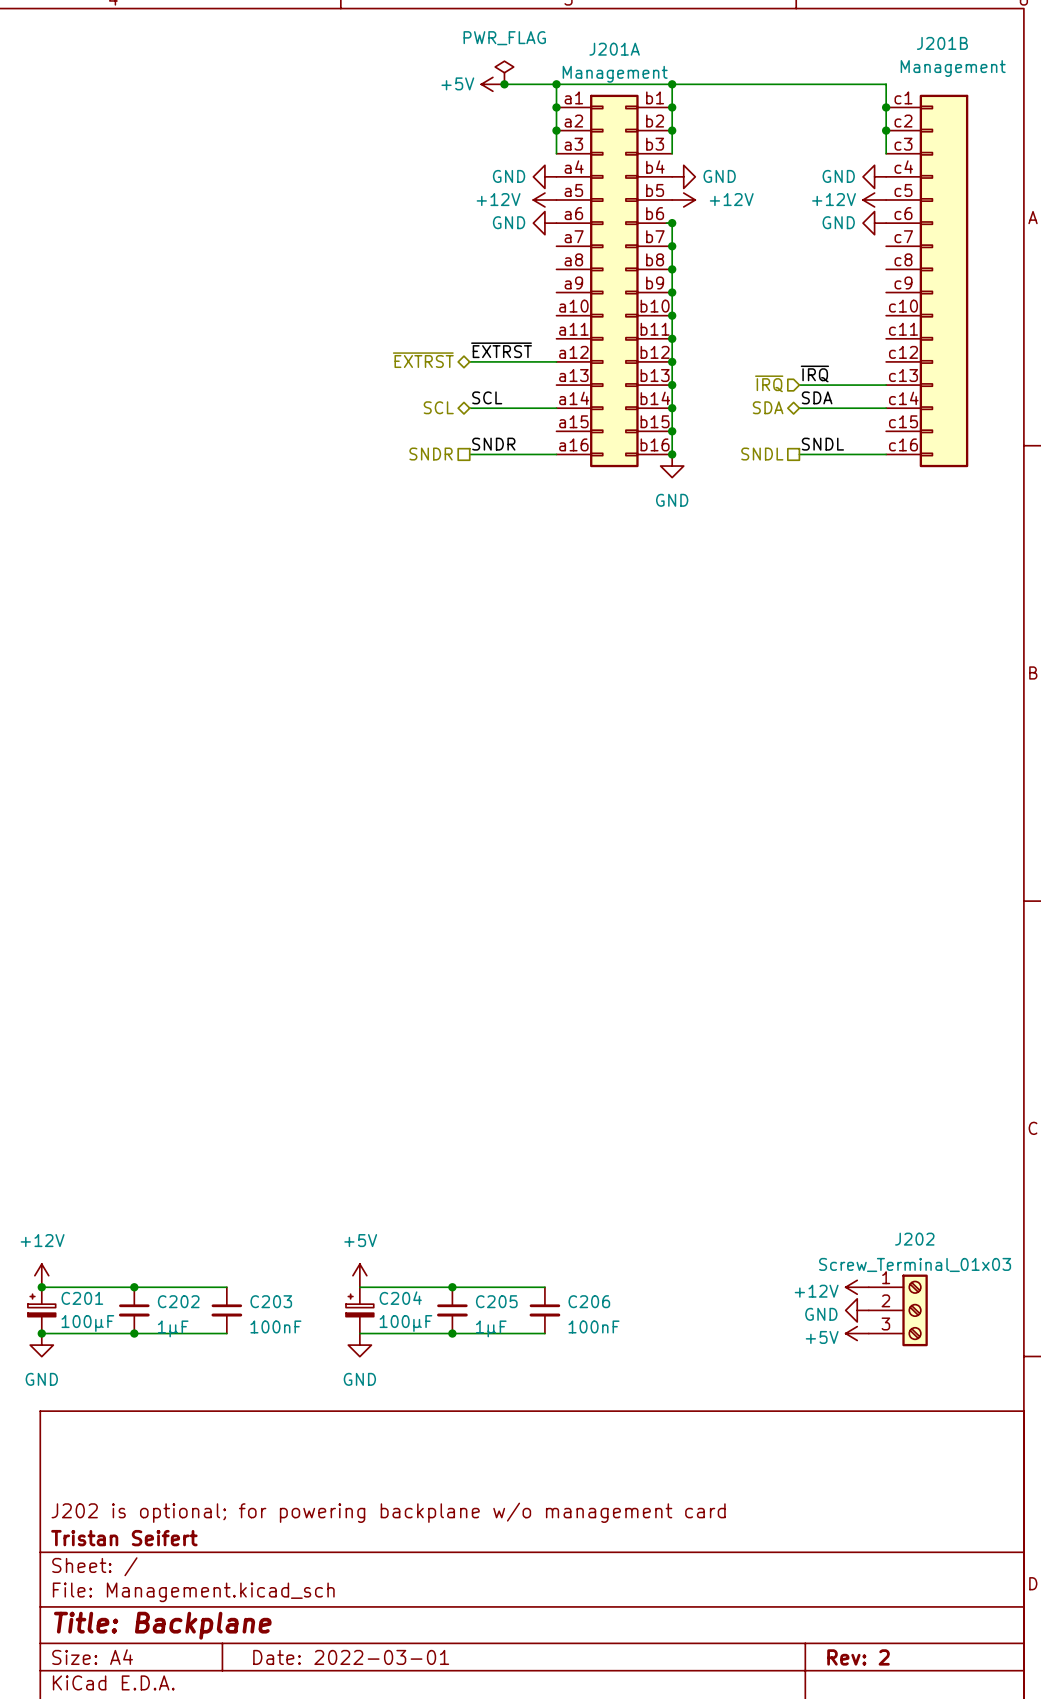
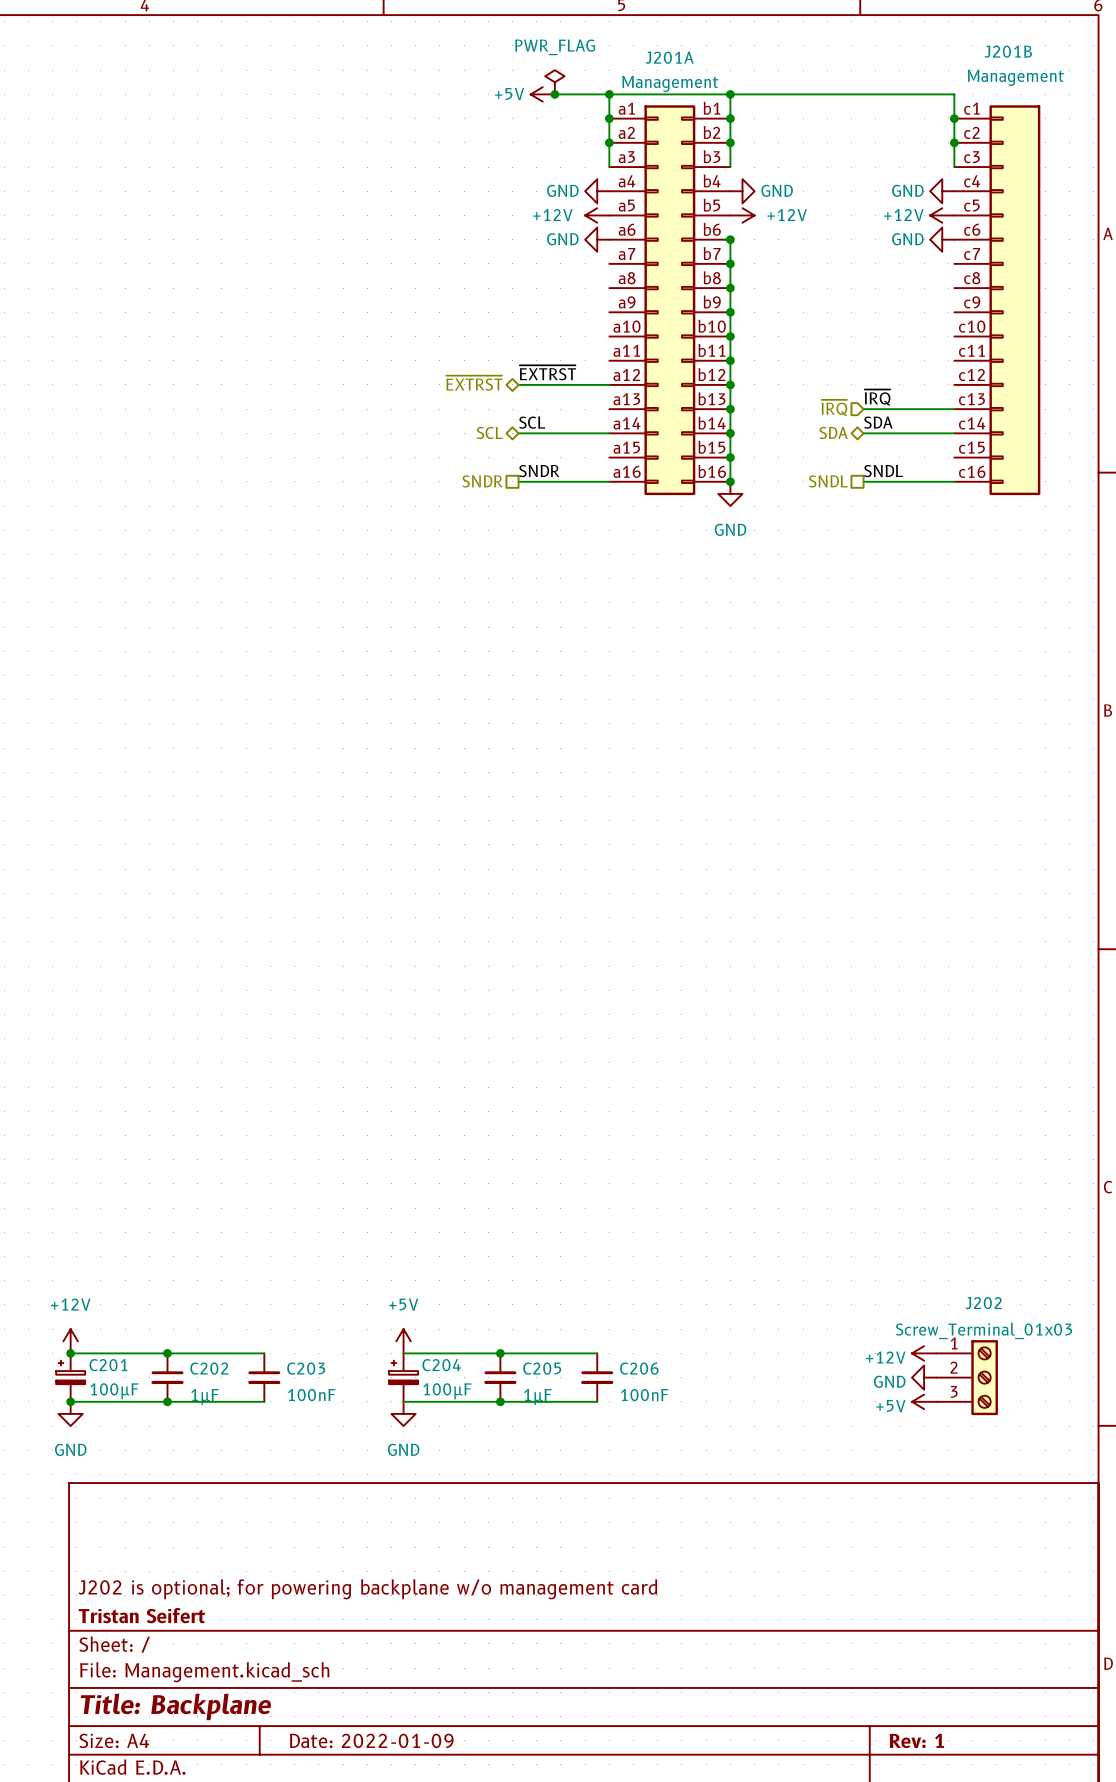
title block: Date: 2022-03-01 (351, 1657) -> Date: 2022-01-09 (371, 1740)
title block: Rev: 2 (858, 1657) -> Rev: 1 (916, 1740)

